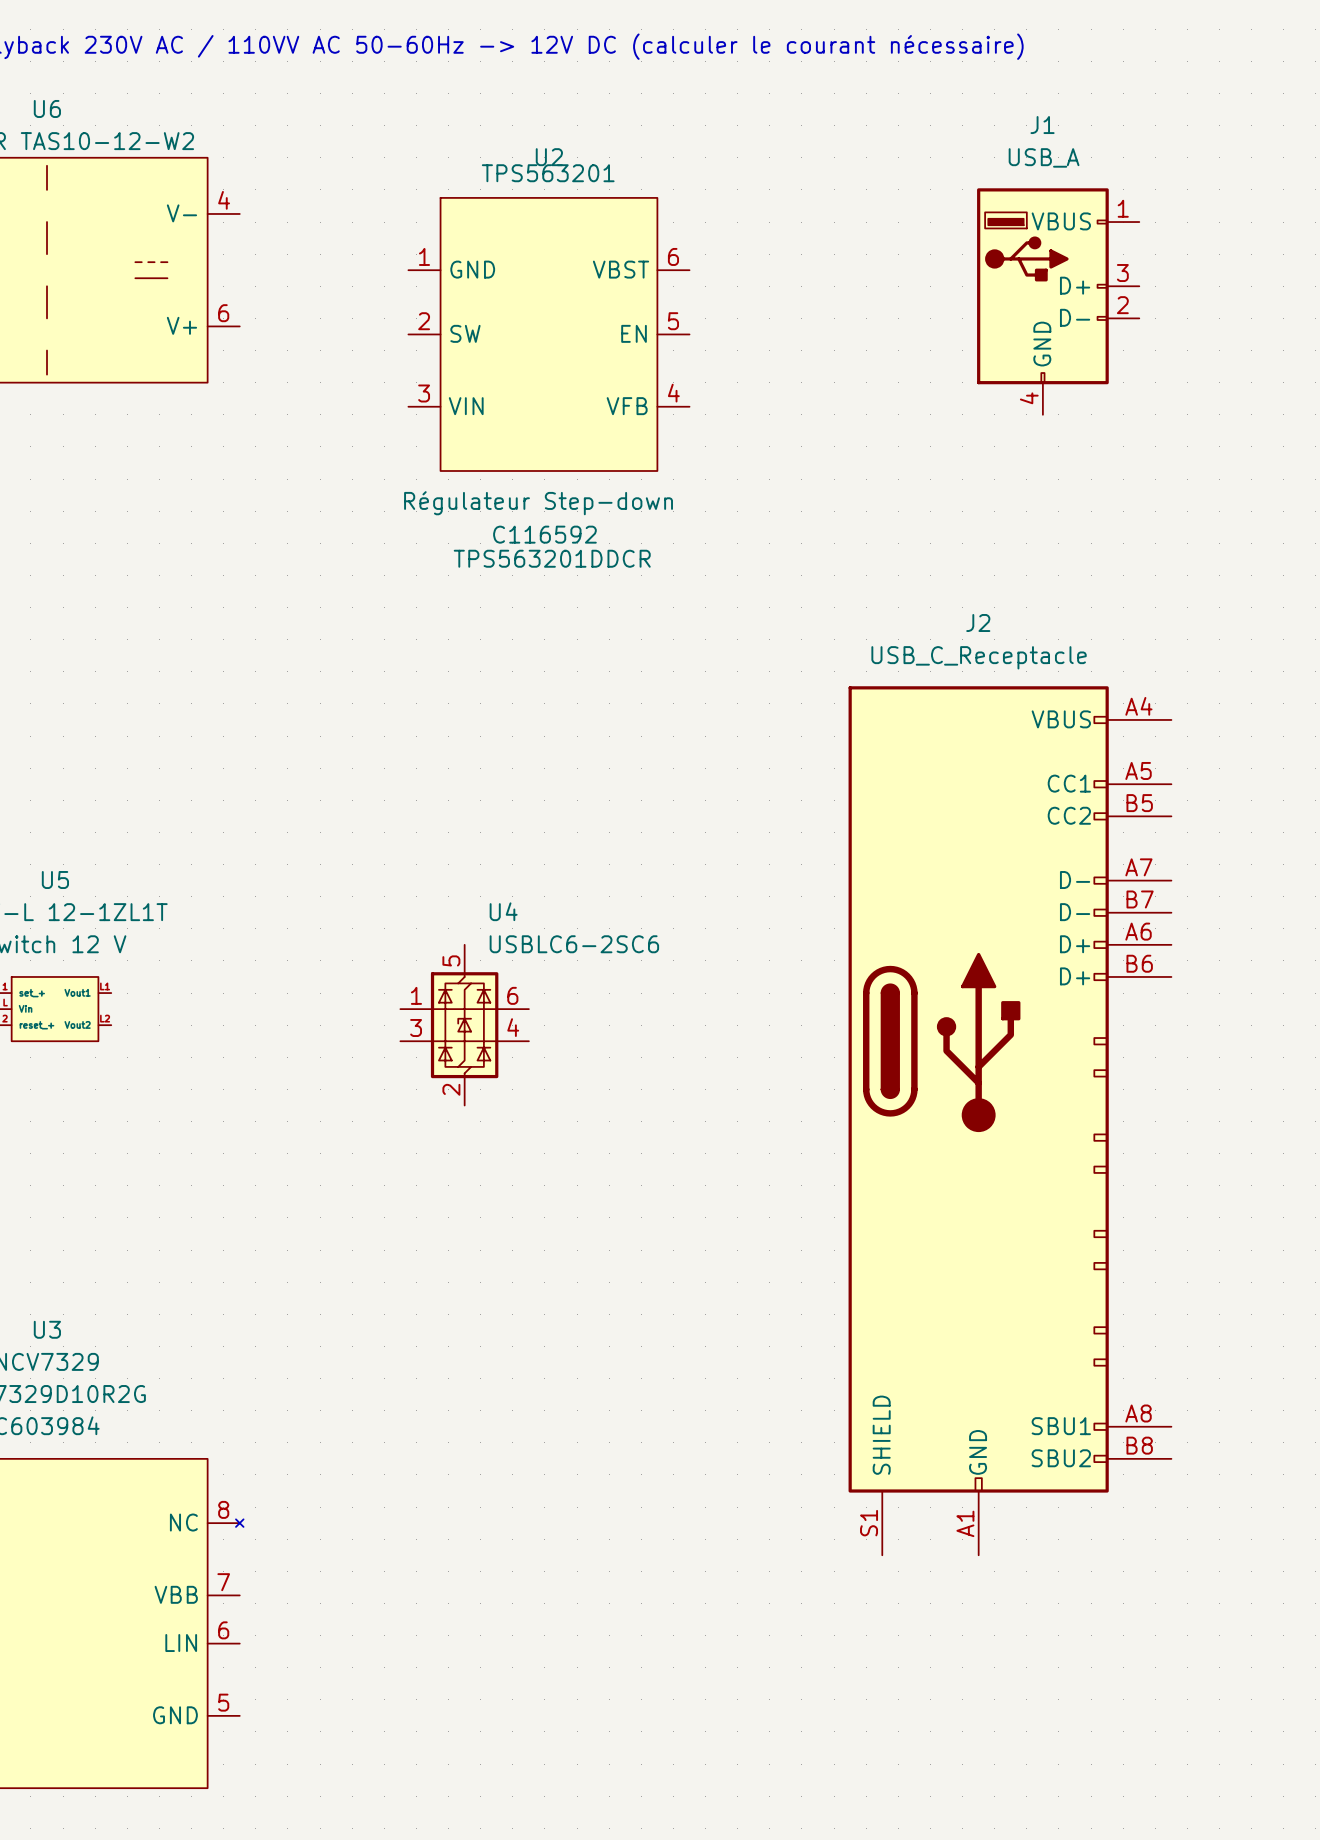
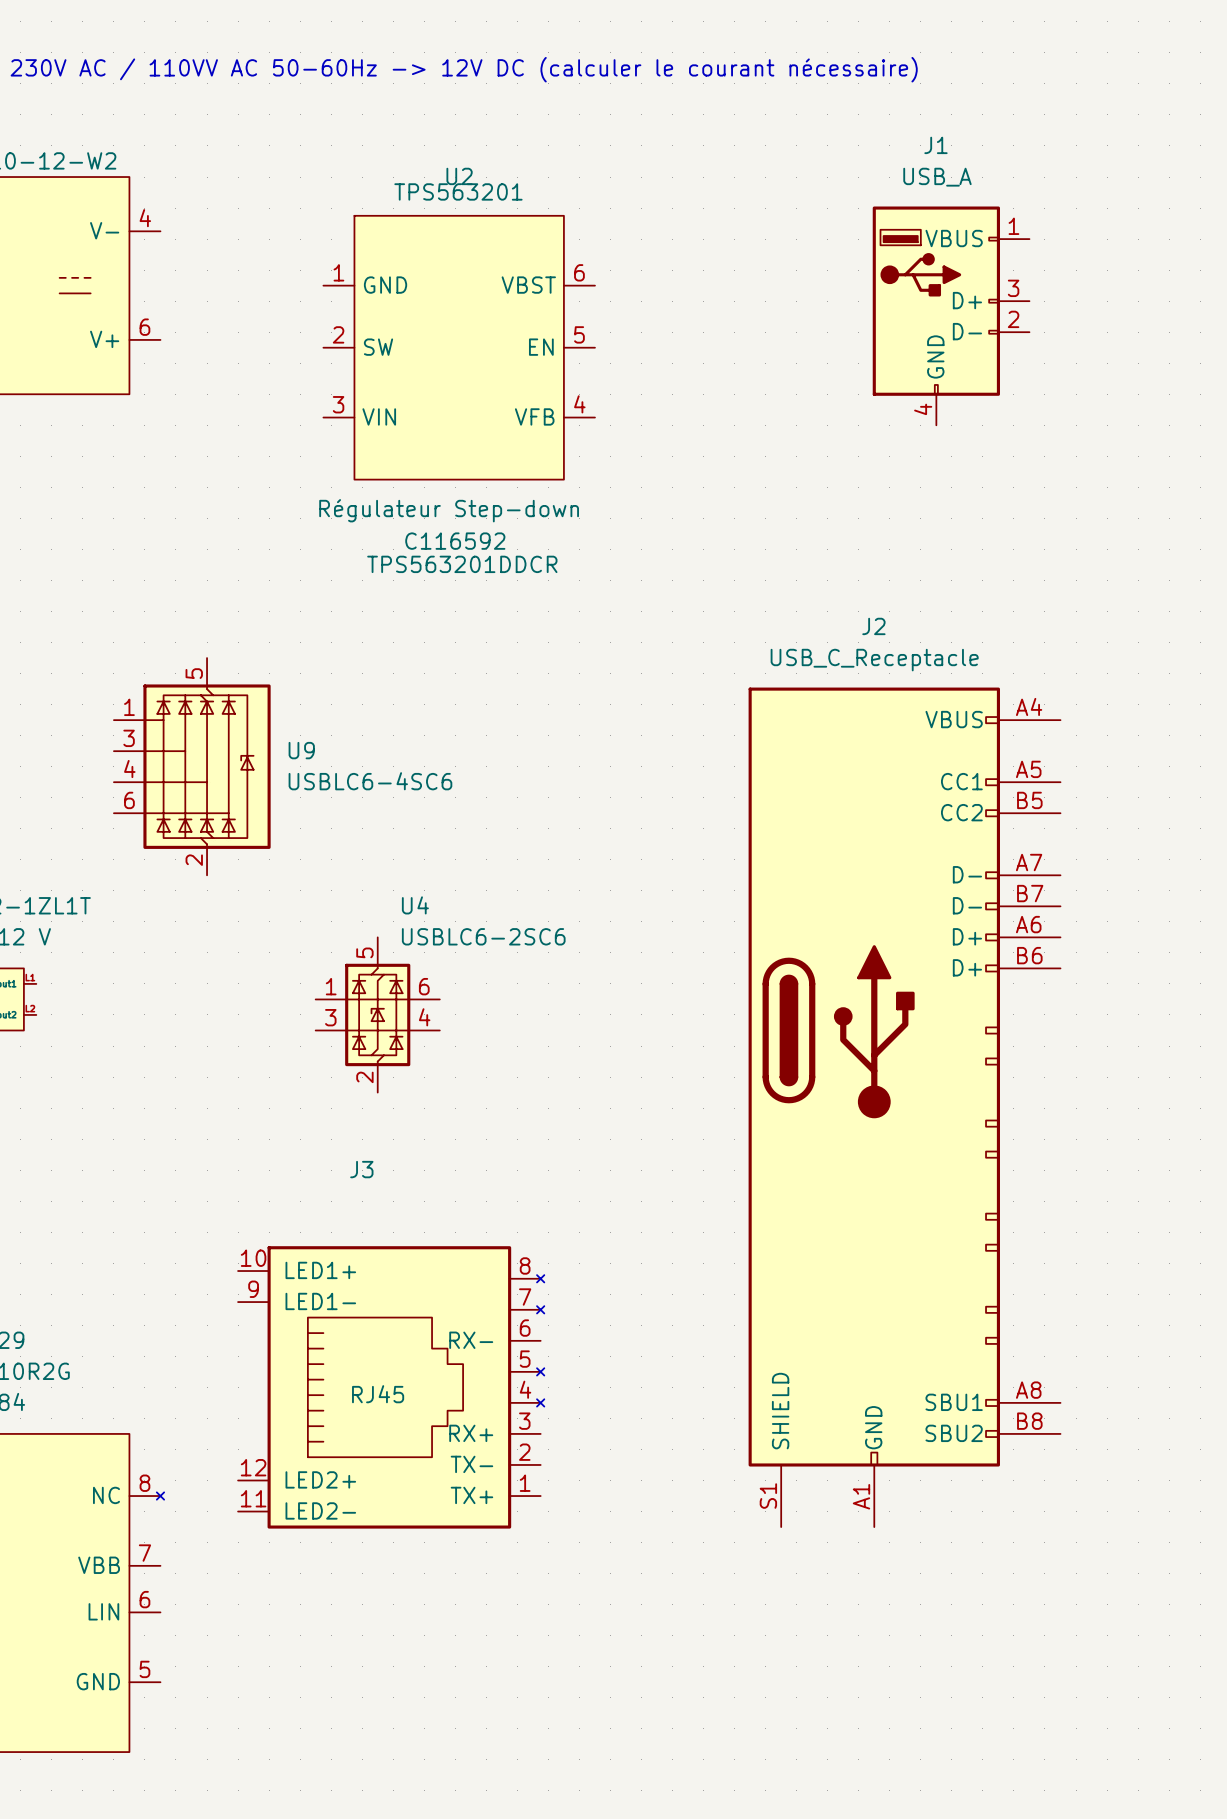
U9: none -> USBLC6-4SC6 (192, 766)
J3: none -> RJ45 (391, 1387)

